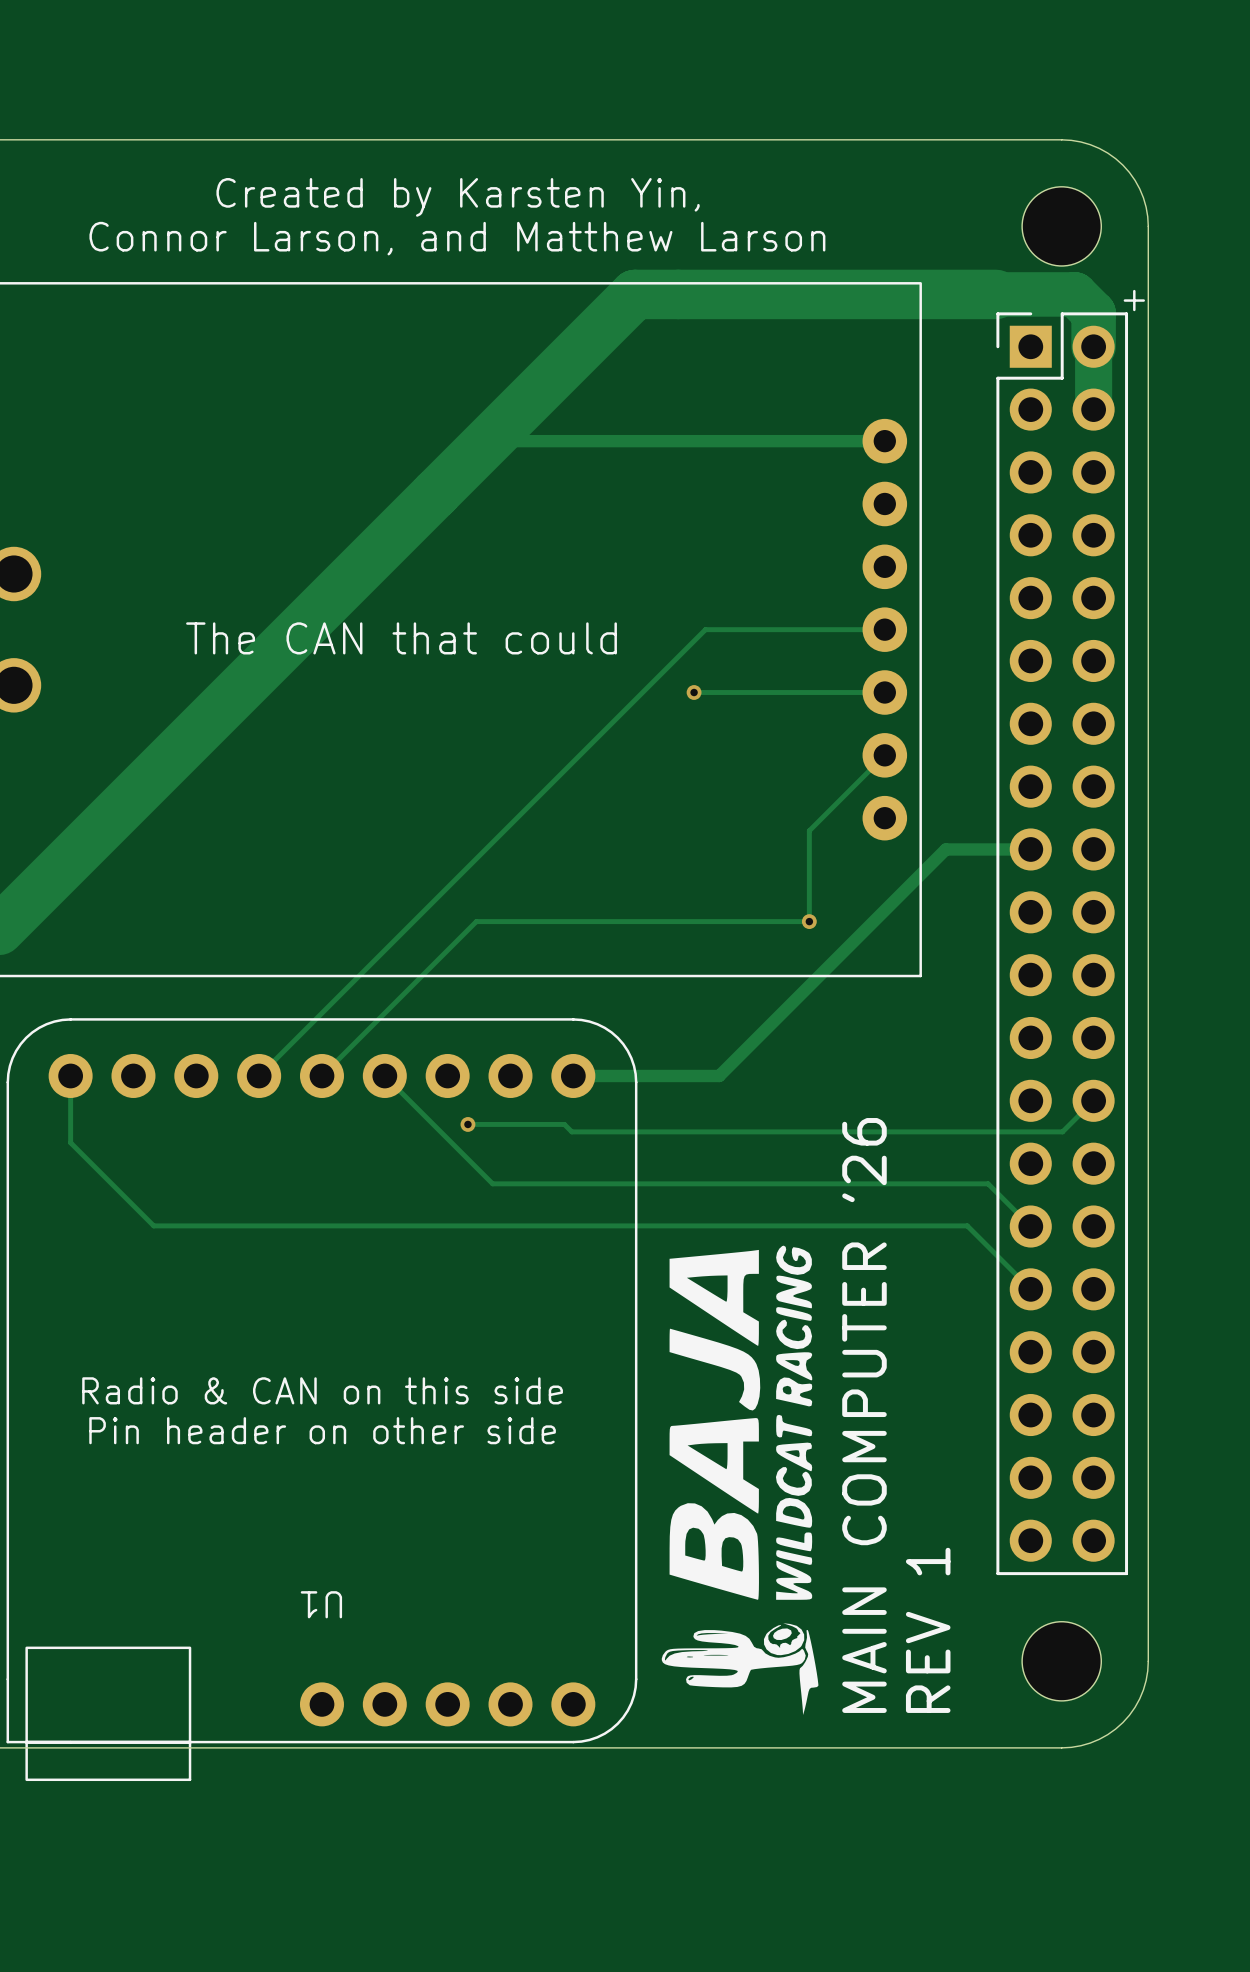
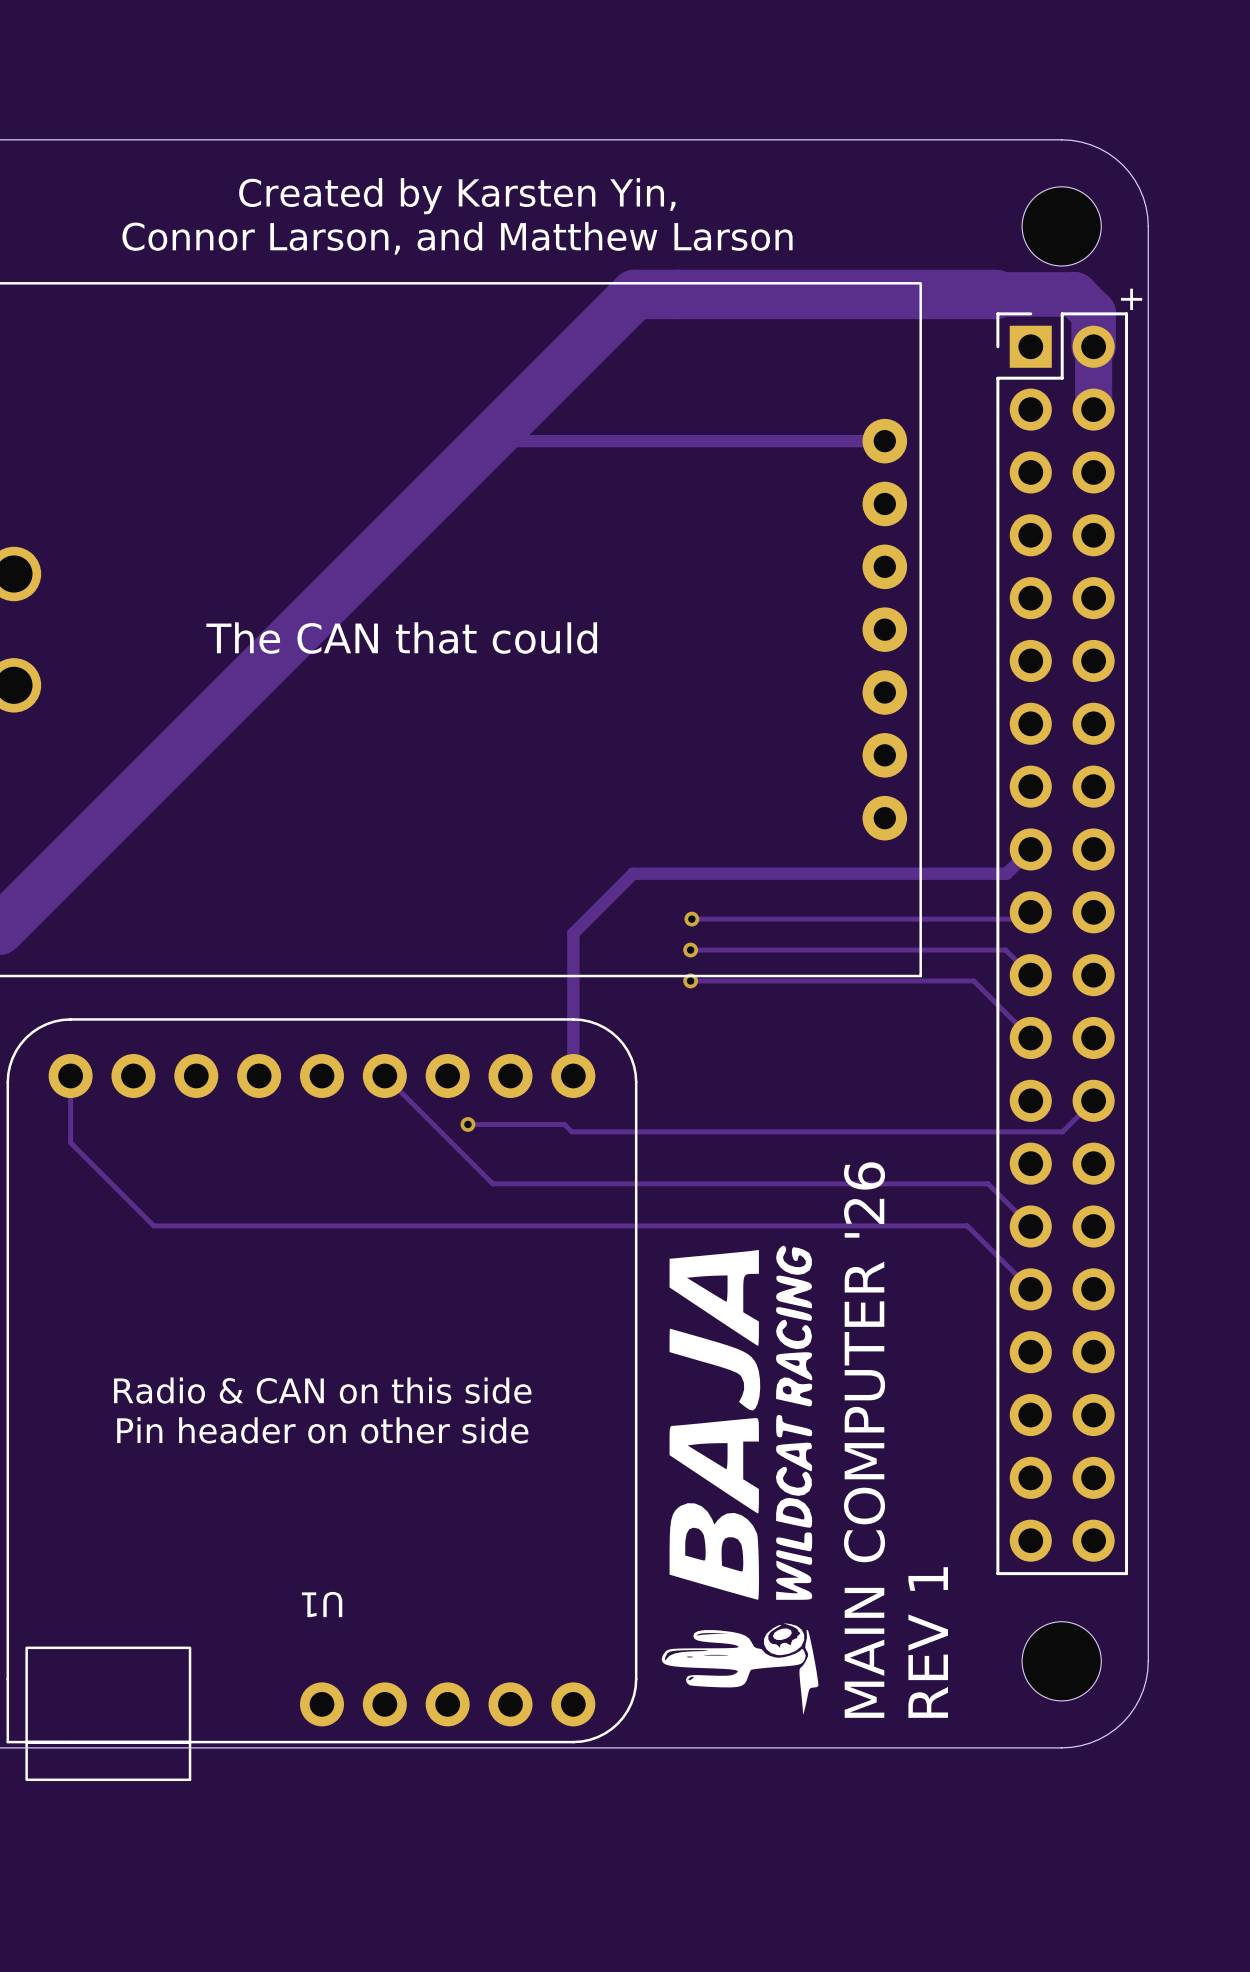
track: (884, 629) (705, 629) (259, 1075) -> none
track: (694, 692) (884, 692) -> none
via: (694, 692) -> none
track: (884, 755) (809, 830) (809, 921) (476, 921) (321, 1075) -> none
track: (1030, 849) (945, 849) (719, 1075) (573, 1075) -> (1030, 849) (1006, 873) (633, 873) (573, 933) (573, 1075)
track: none -> (1030, 912) (1023, 919) (691, 919)
via: none -> (691, 919)
via: (809, 921) -> none
track: none -> (690, 950) (1005, 950) (1030, 975)
via: none -> (690, 950)
track: none -> (690, 980) (973, 980) (1030, 1037)
via: none -> (690, 980)

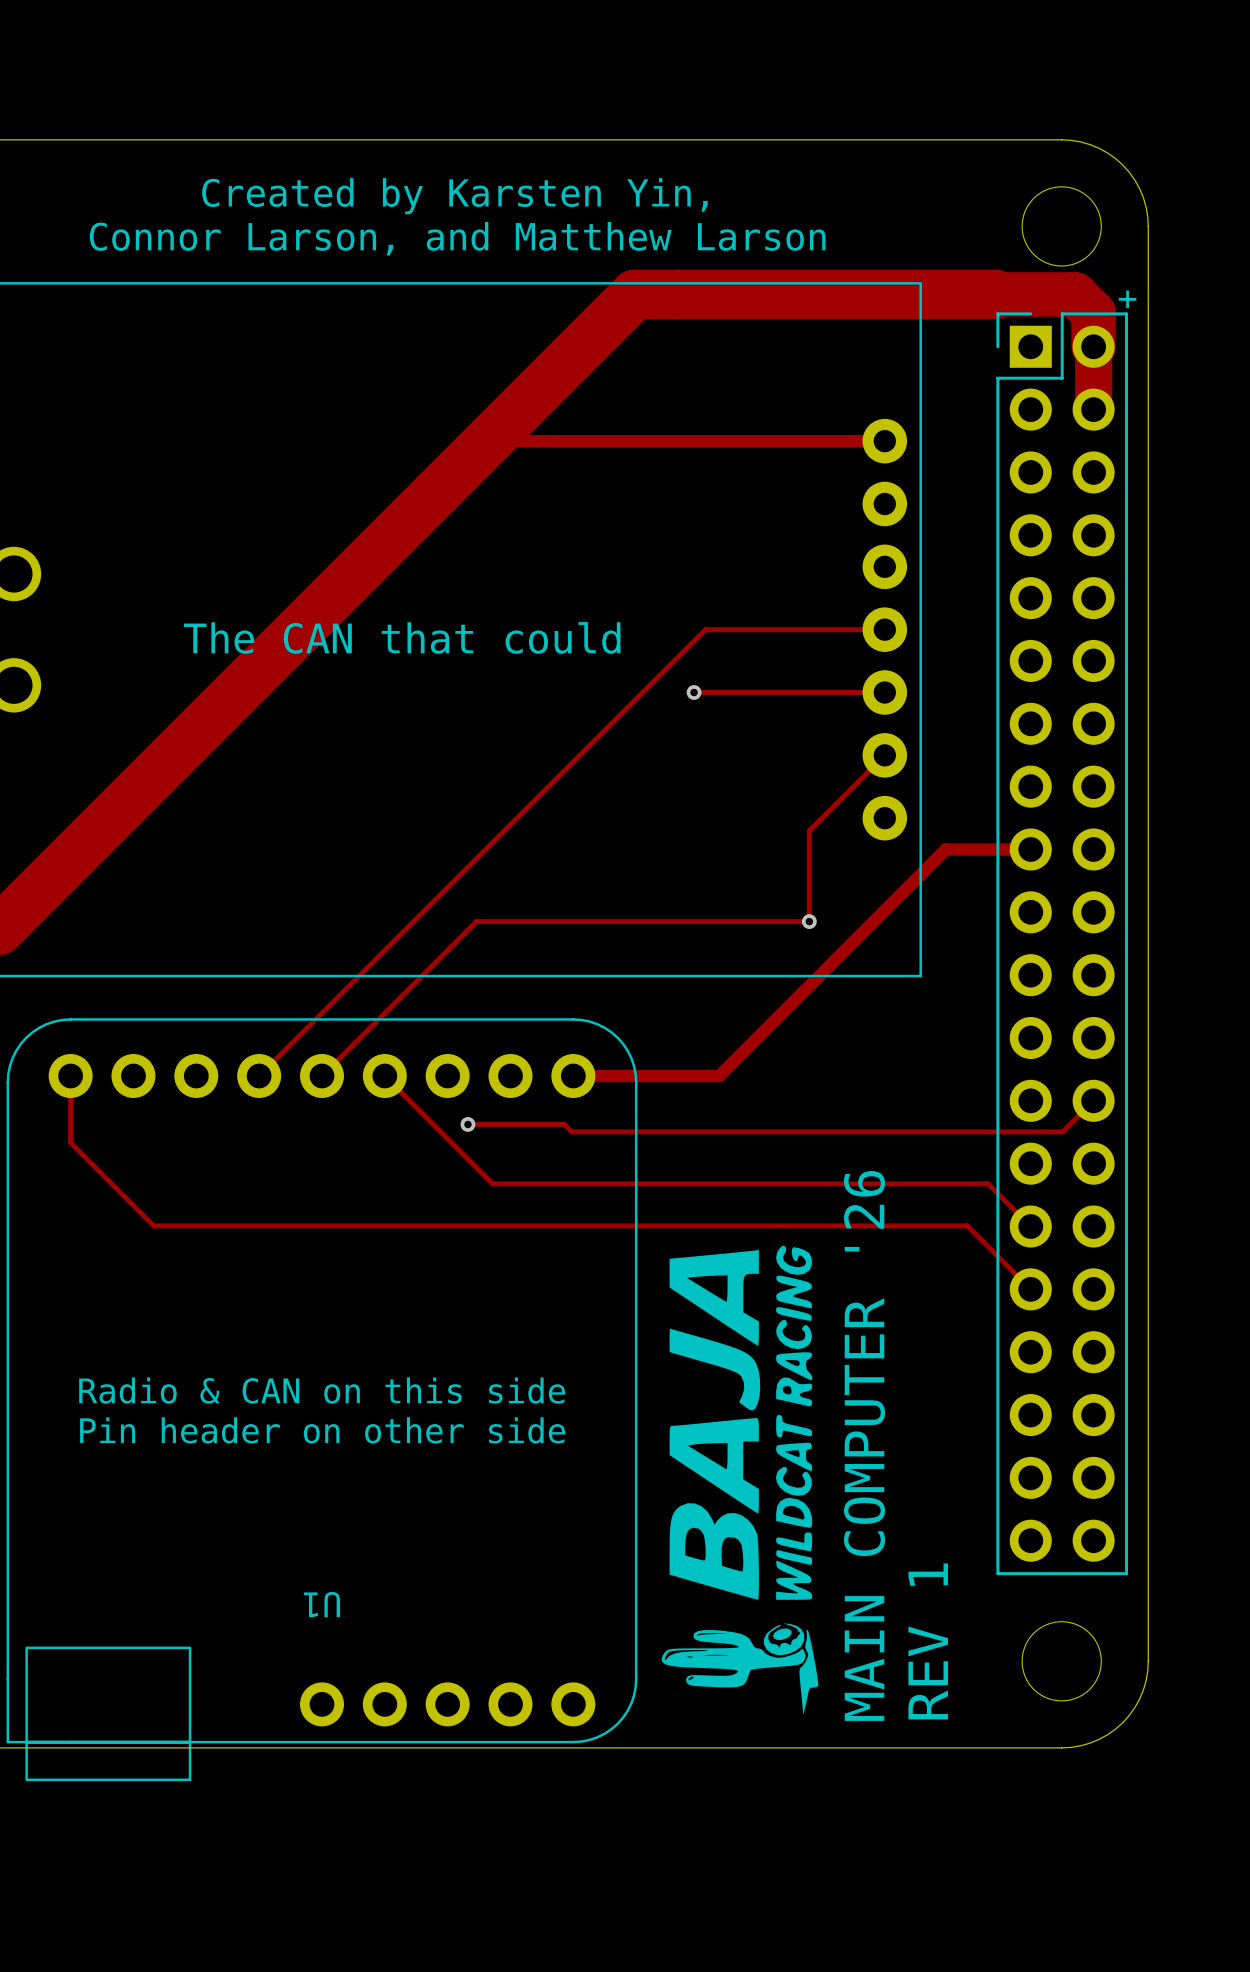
track: none -> (884, 629) (705, 629) (259, 1075)
track: none -> (694, 692) (884, 692)
via: none -> (694, 692)
track: none -> (884, 755) (809, 830) (809, 921) (476, 921) (321, 1075)
track: (1030, 849) (1006, 873) (633, 873) (573, 933) (573, 1075) -> (1030, 849) (945, 849) (719, 1075) (573, 1075)
track: (1030, 912) (1023, 919) (691, 919) -> none
via: (691, 919) -> none
via: none -> (809, 921)
track: (690, 950) (1005, 950) (1030, 975) -> none
via: (690, 950) -> none
track: (690, 980) (973, 980) (1030, 1037) -> none
via: (690, 980) -> none

